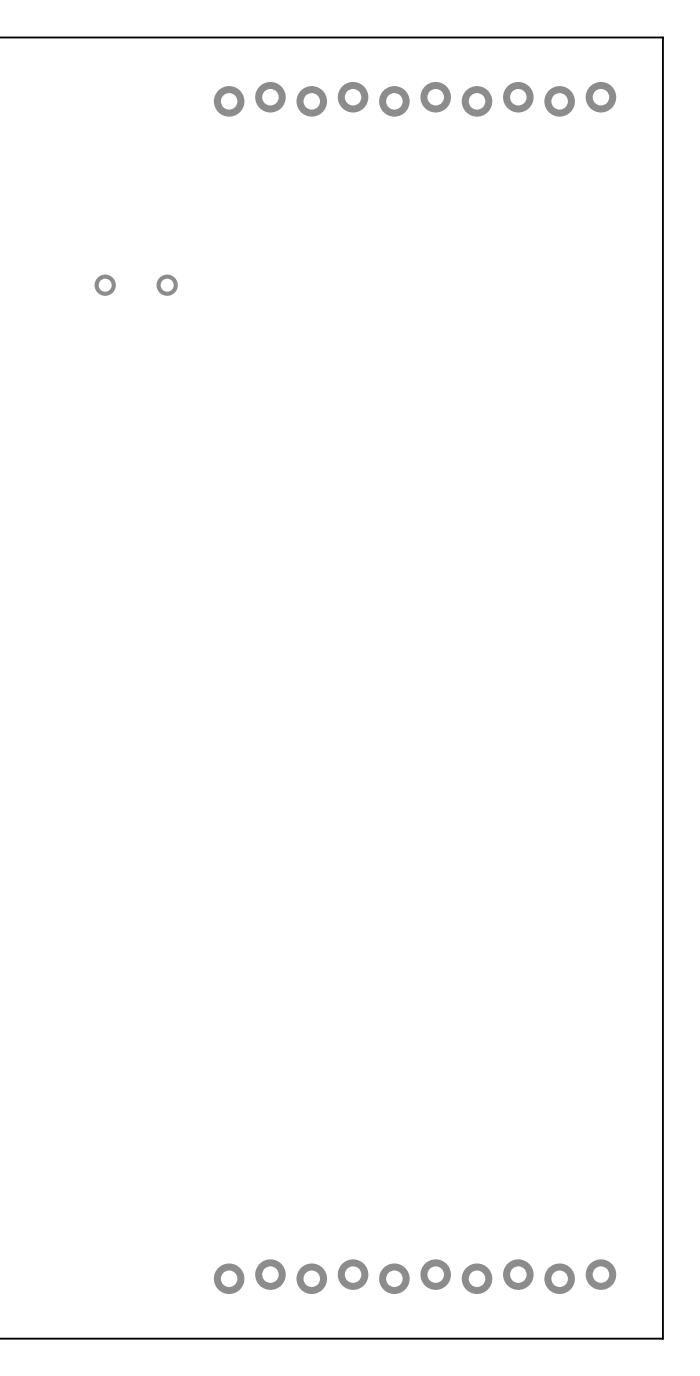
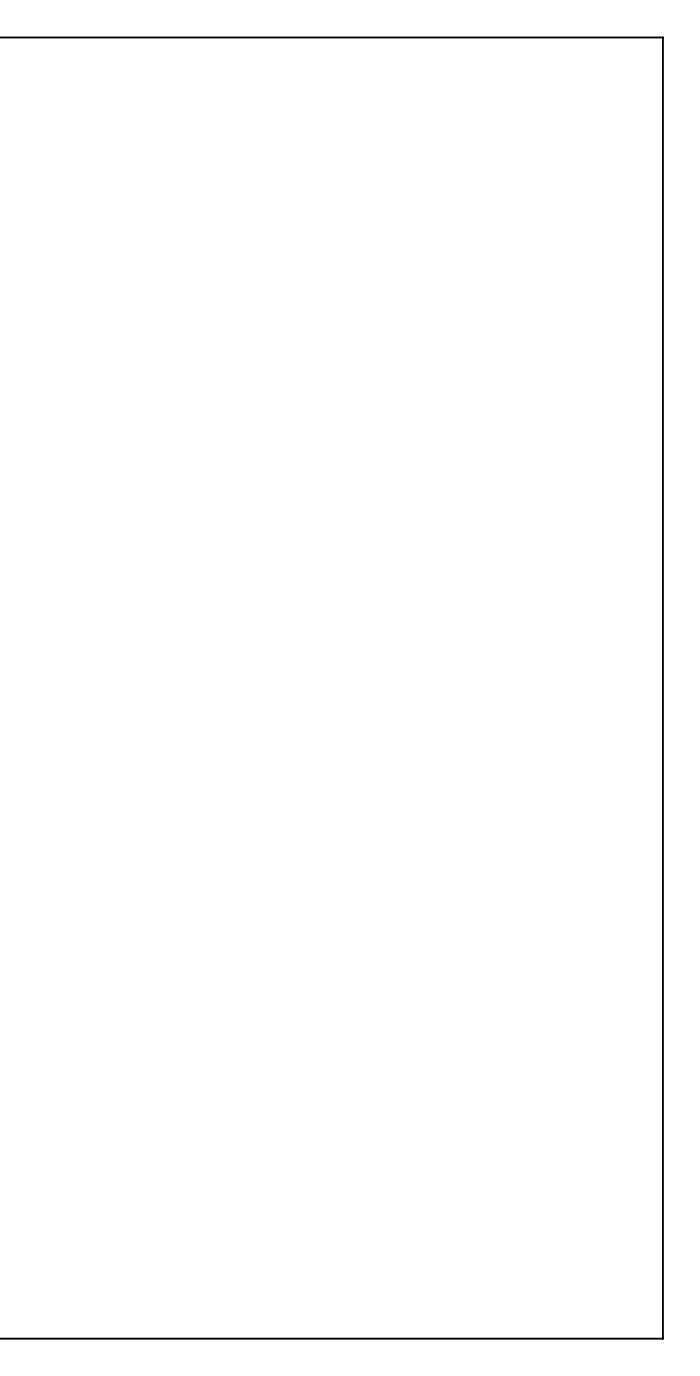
part: (415, 99) -> none
part: (105, 285) -> none
part: (167, 285) -> none
part: (415, 1276) -> none

